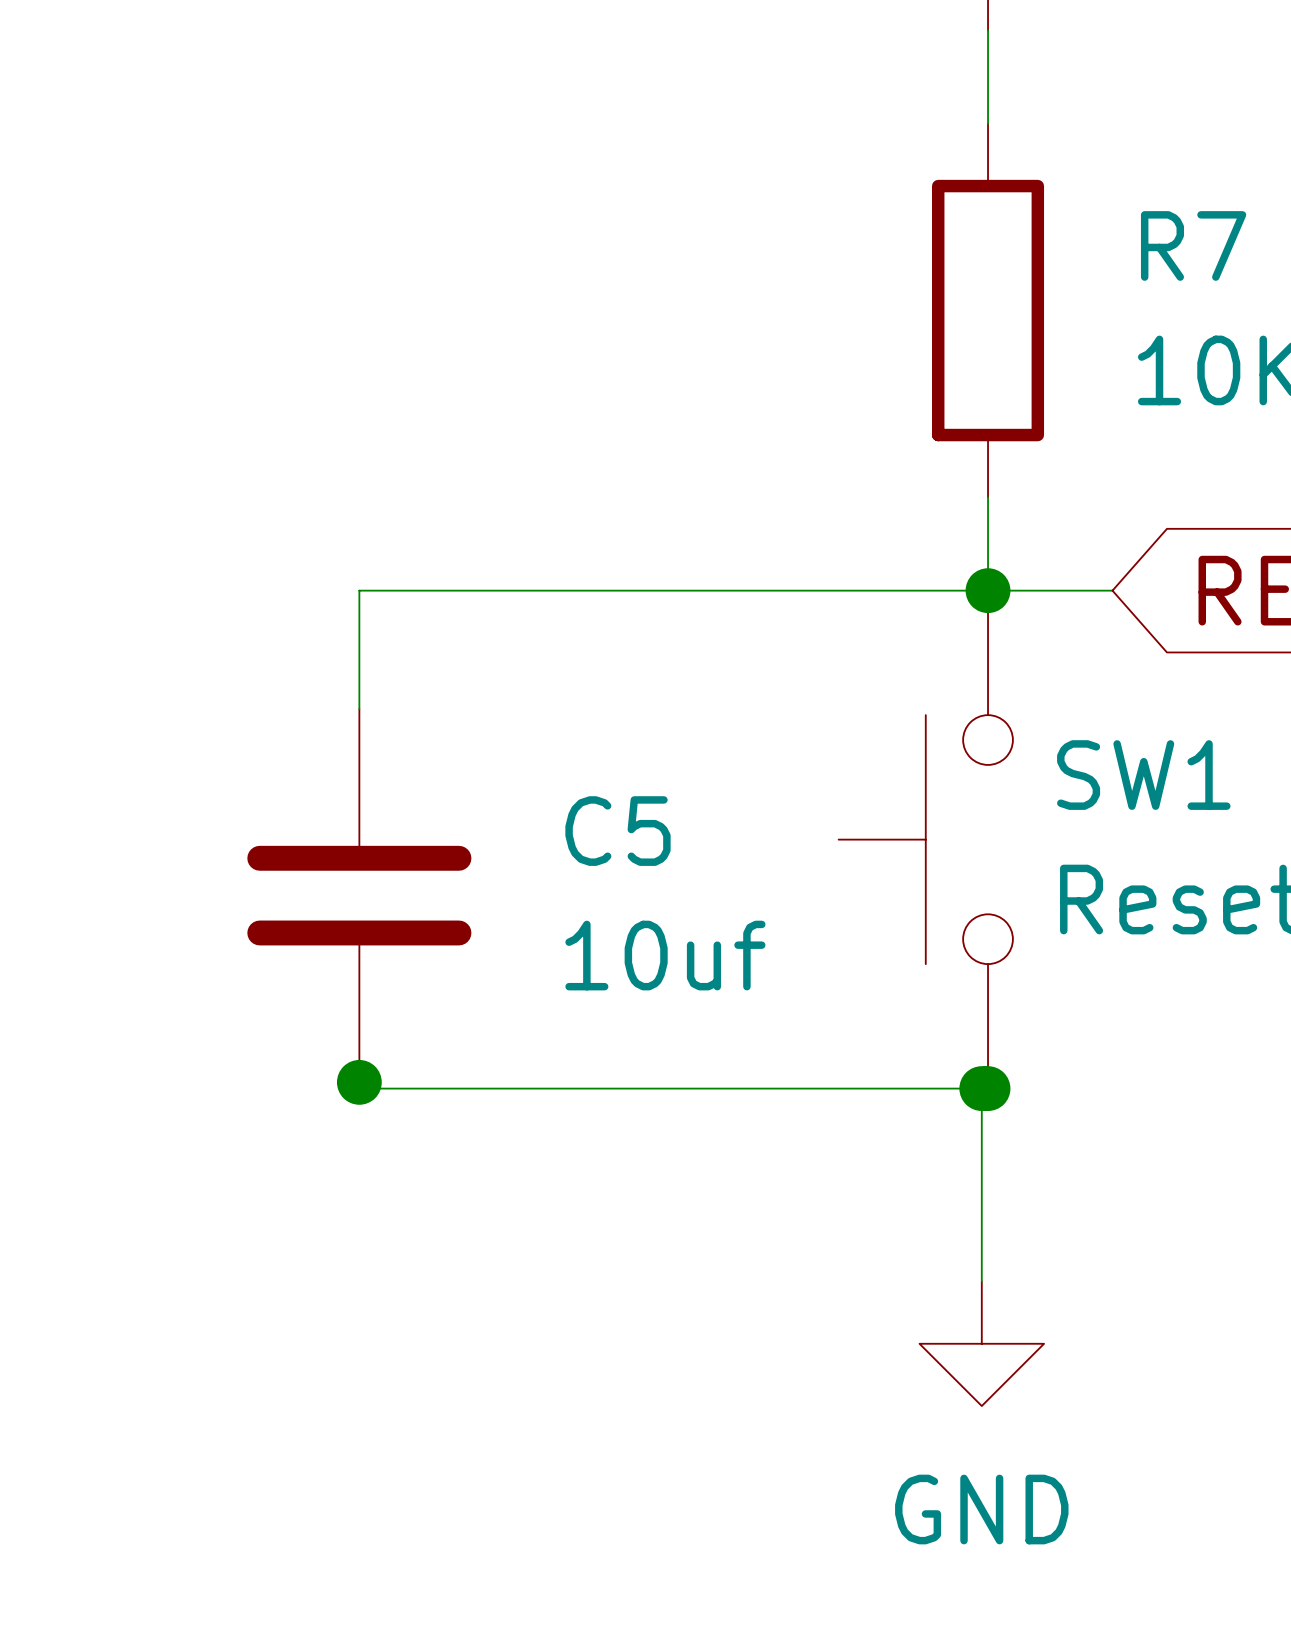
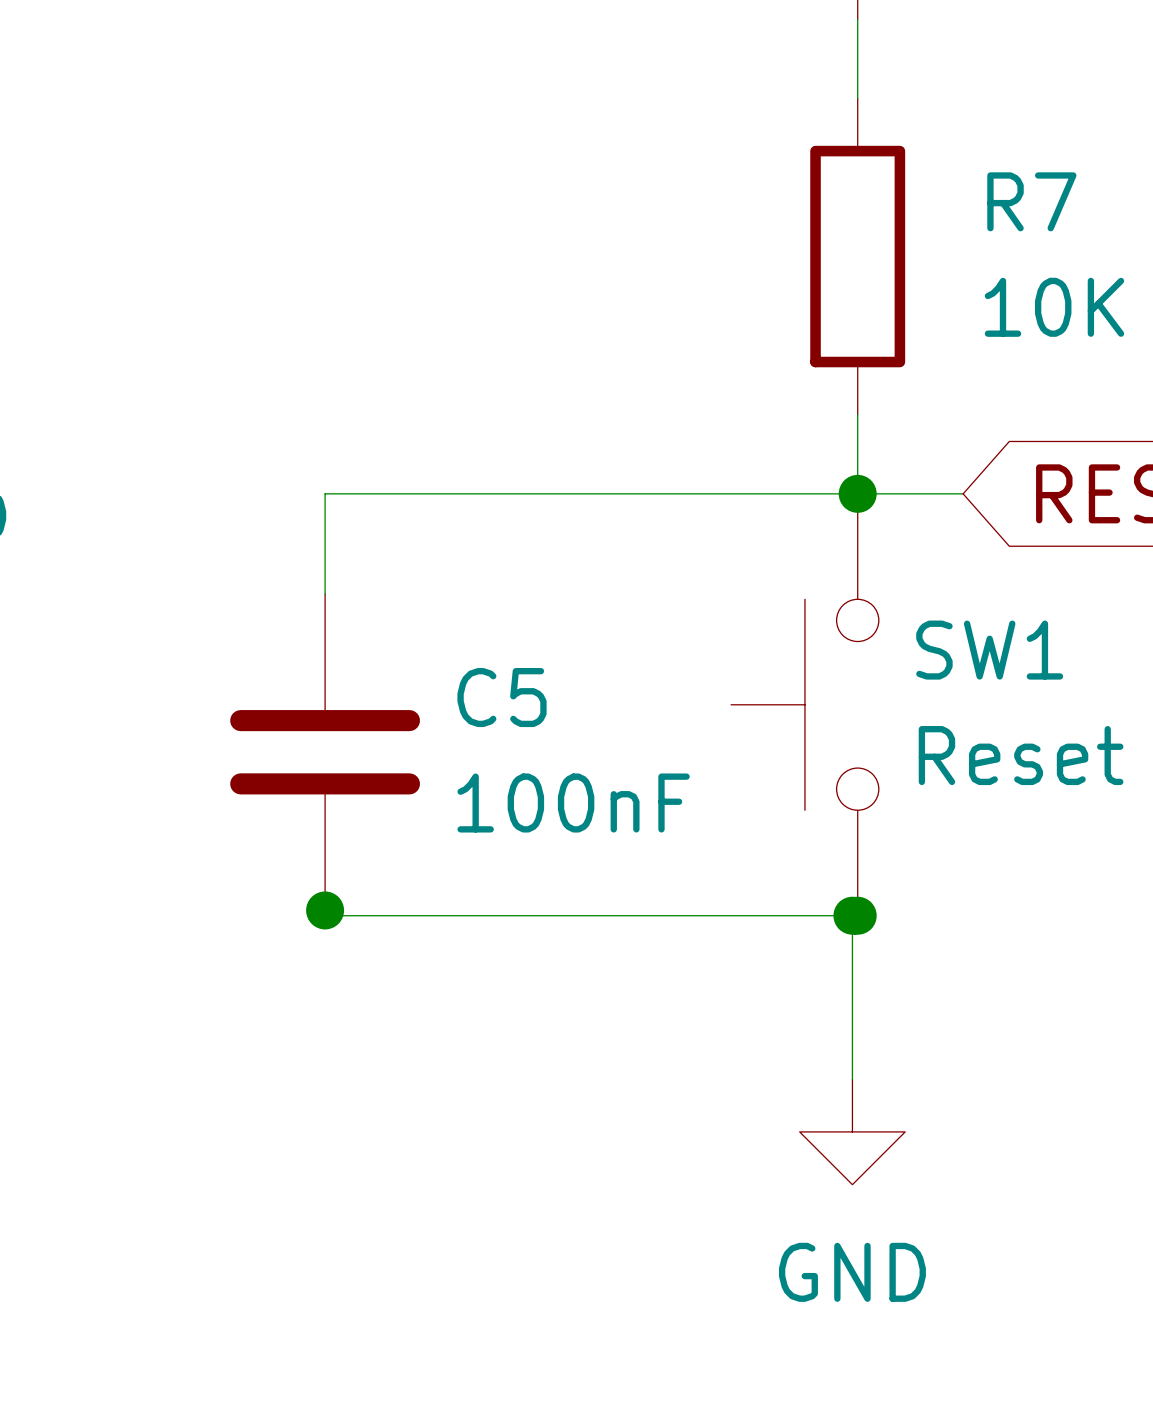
C5 name position: C5 (617, 831) -> C5 (502, 697)
C5 value: 10uf (665, 955) -> 100nF (573, 803)

